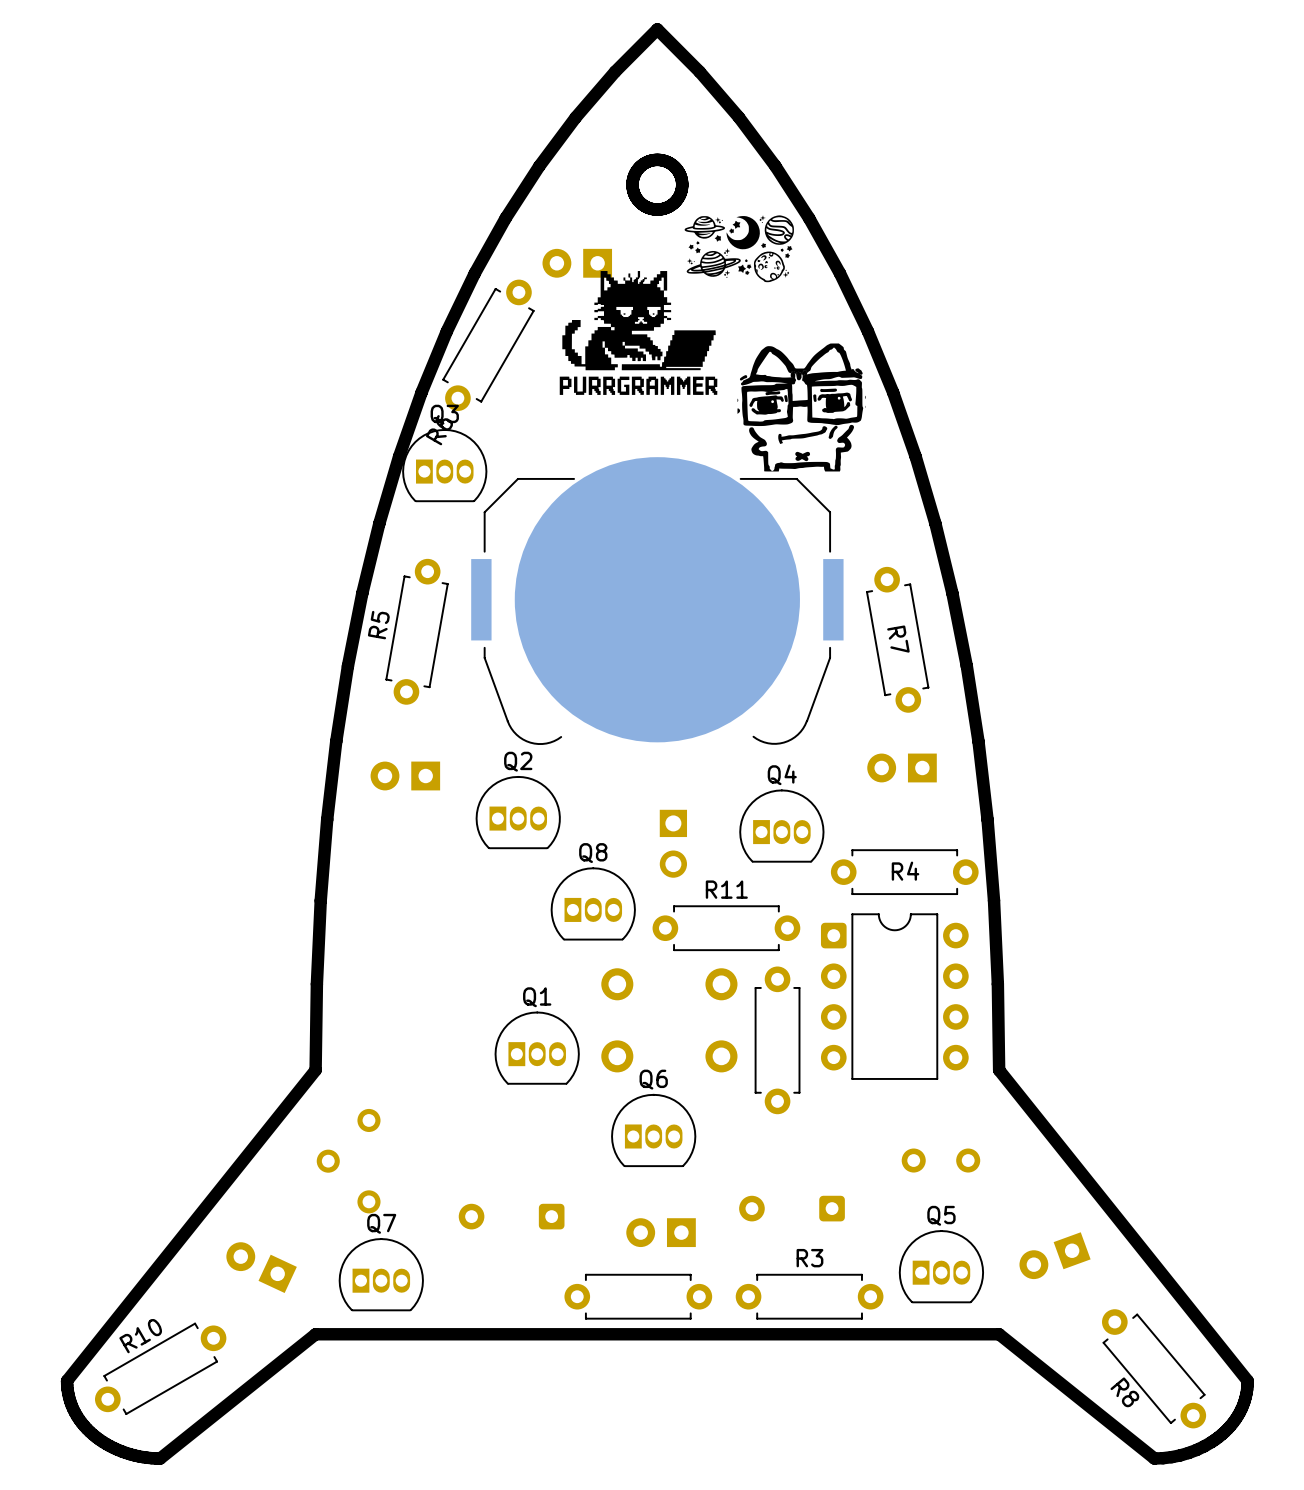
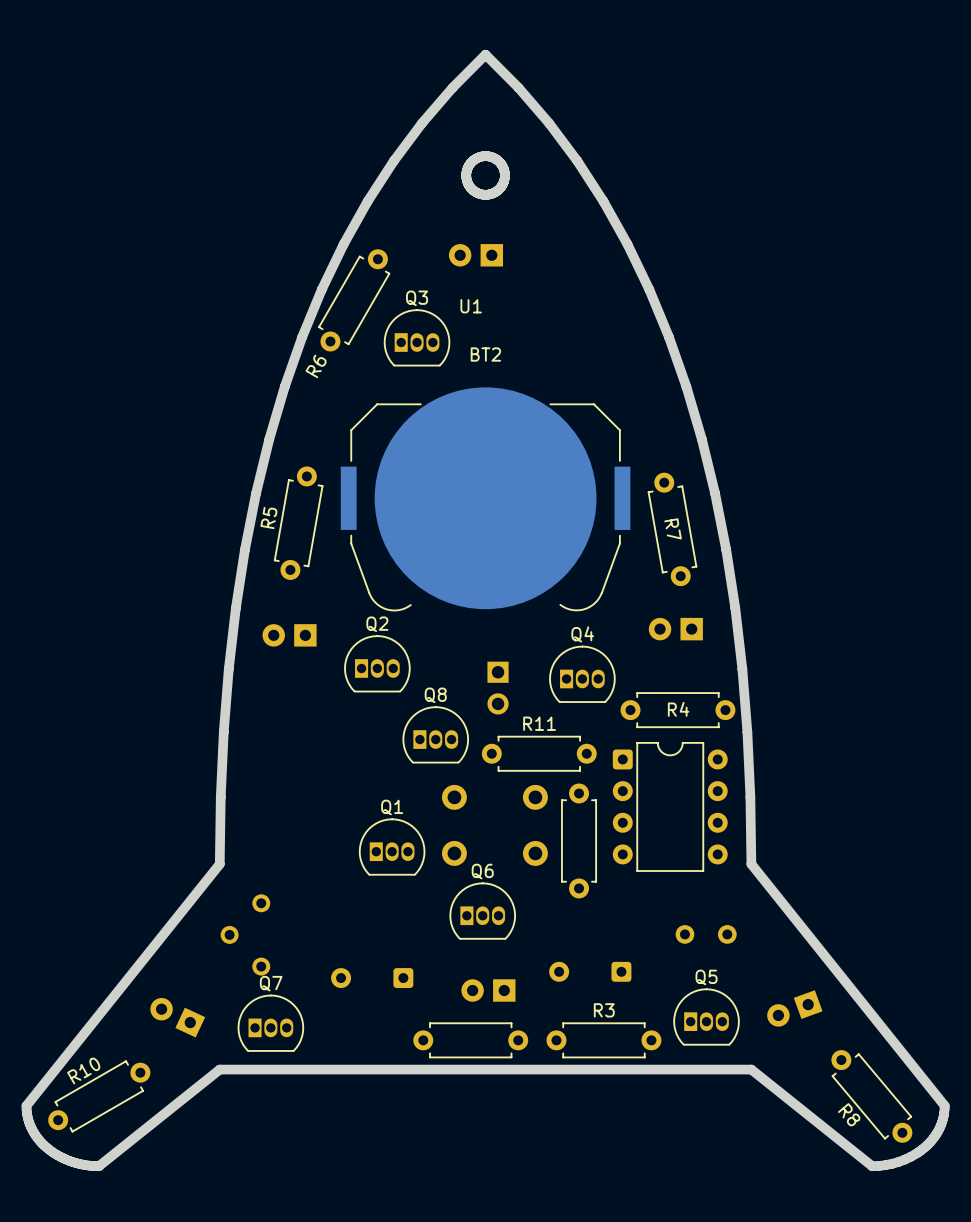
drawing: [559, 215, 794, 395] -> none
part position: (577, 263) -> (475, 255)
drawing: [737, 343, 866, 472] -> none
U1 name: none -> U1 (471, 306)
BT2 name: none -> BT2 (485, 354)
Q3 position: (444, 465) -> (417, 337)

